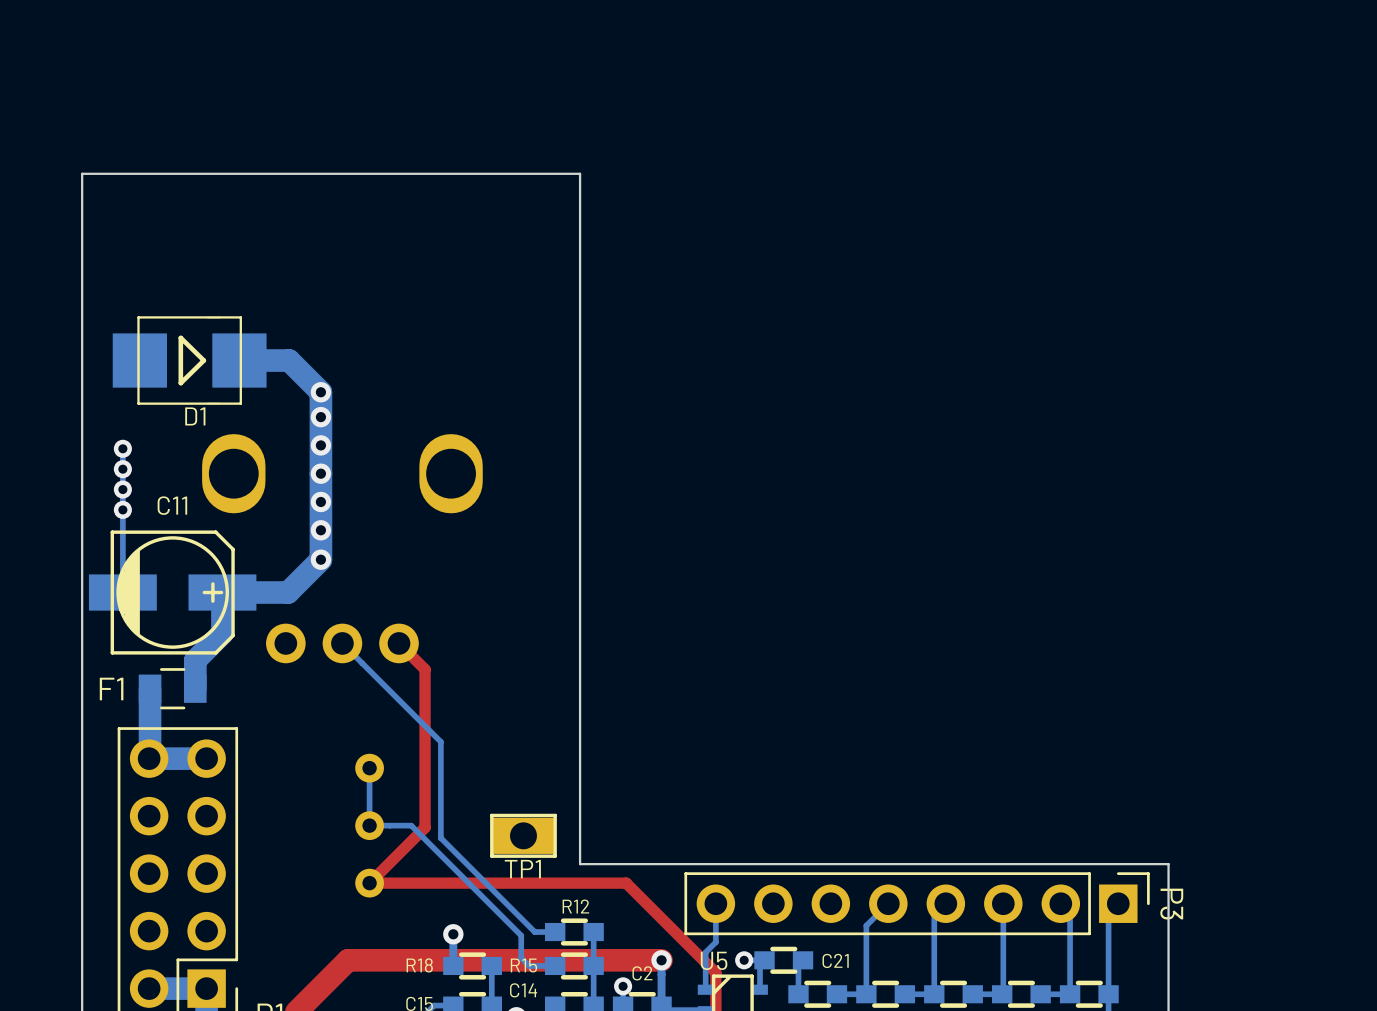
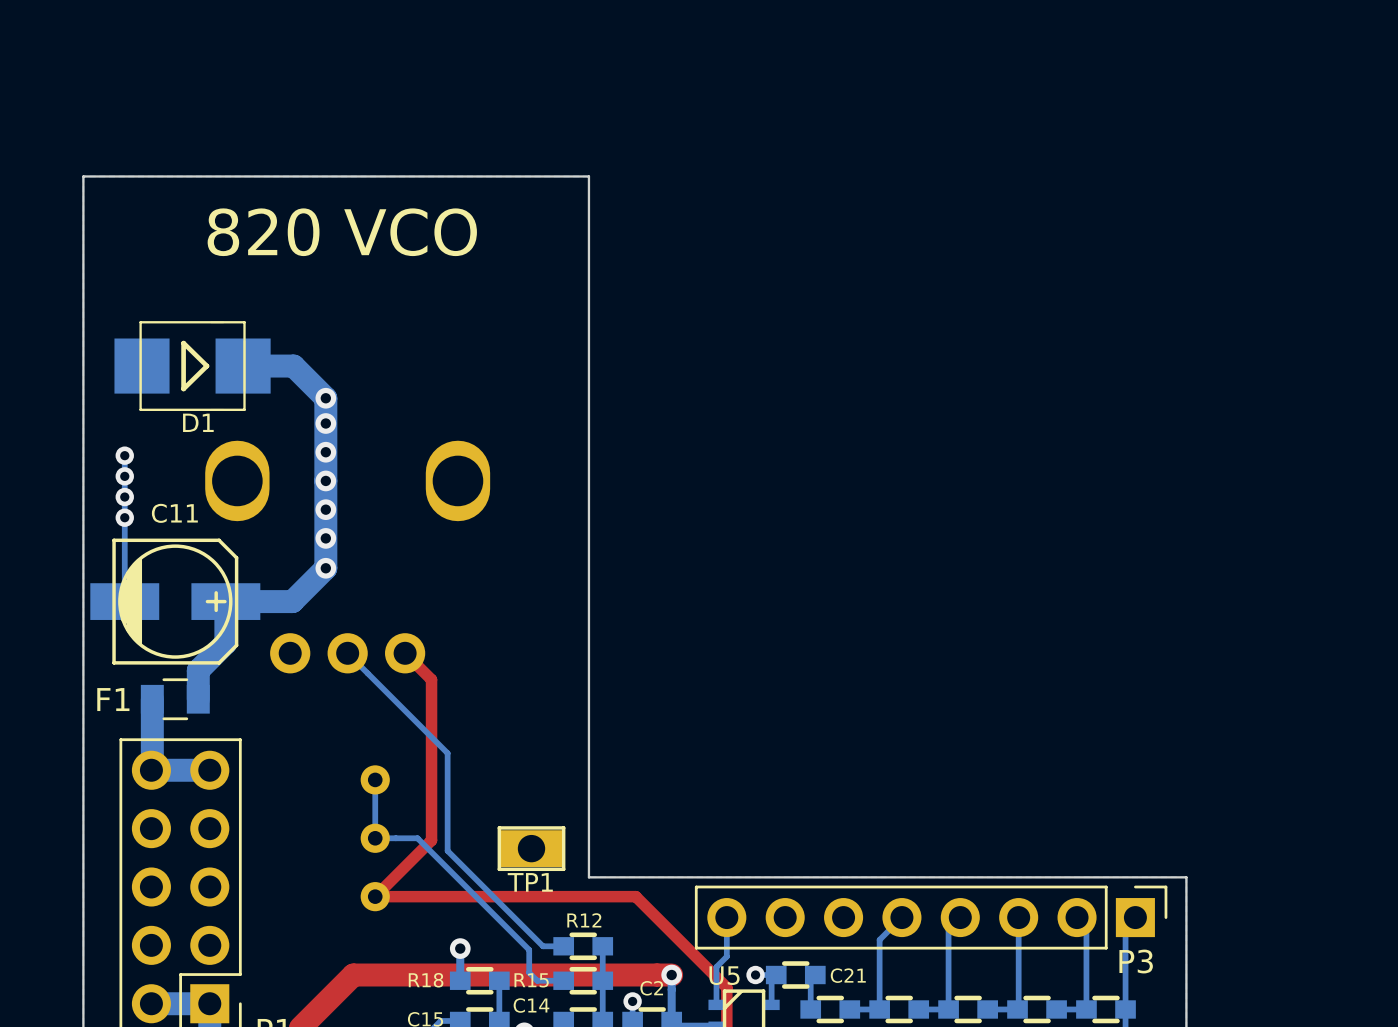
text: none -> 820 VCO (342, 232)
P3 name rotation: 0° (1171, 904) -> 90° counterclockwise (1136, 961)
P3 name position: P3 (1171, 904) -> P3 (1136, 961)

